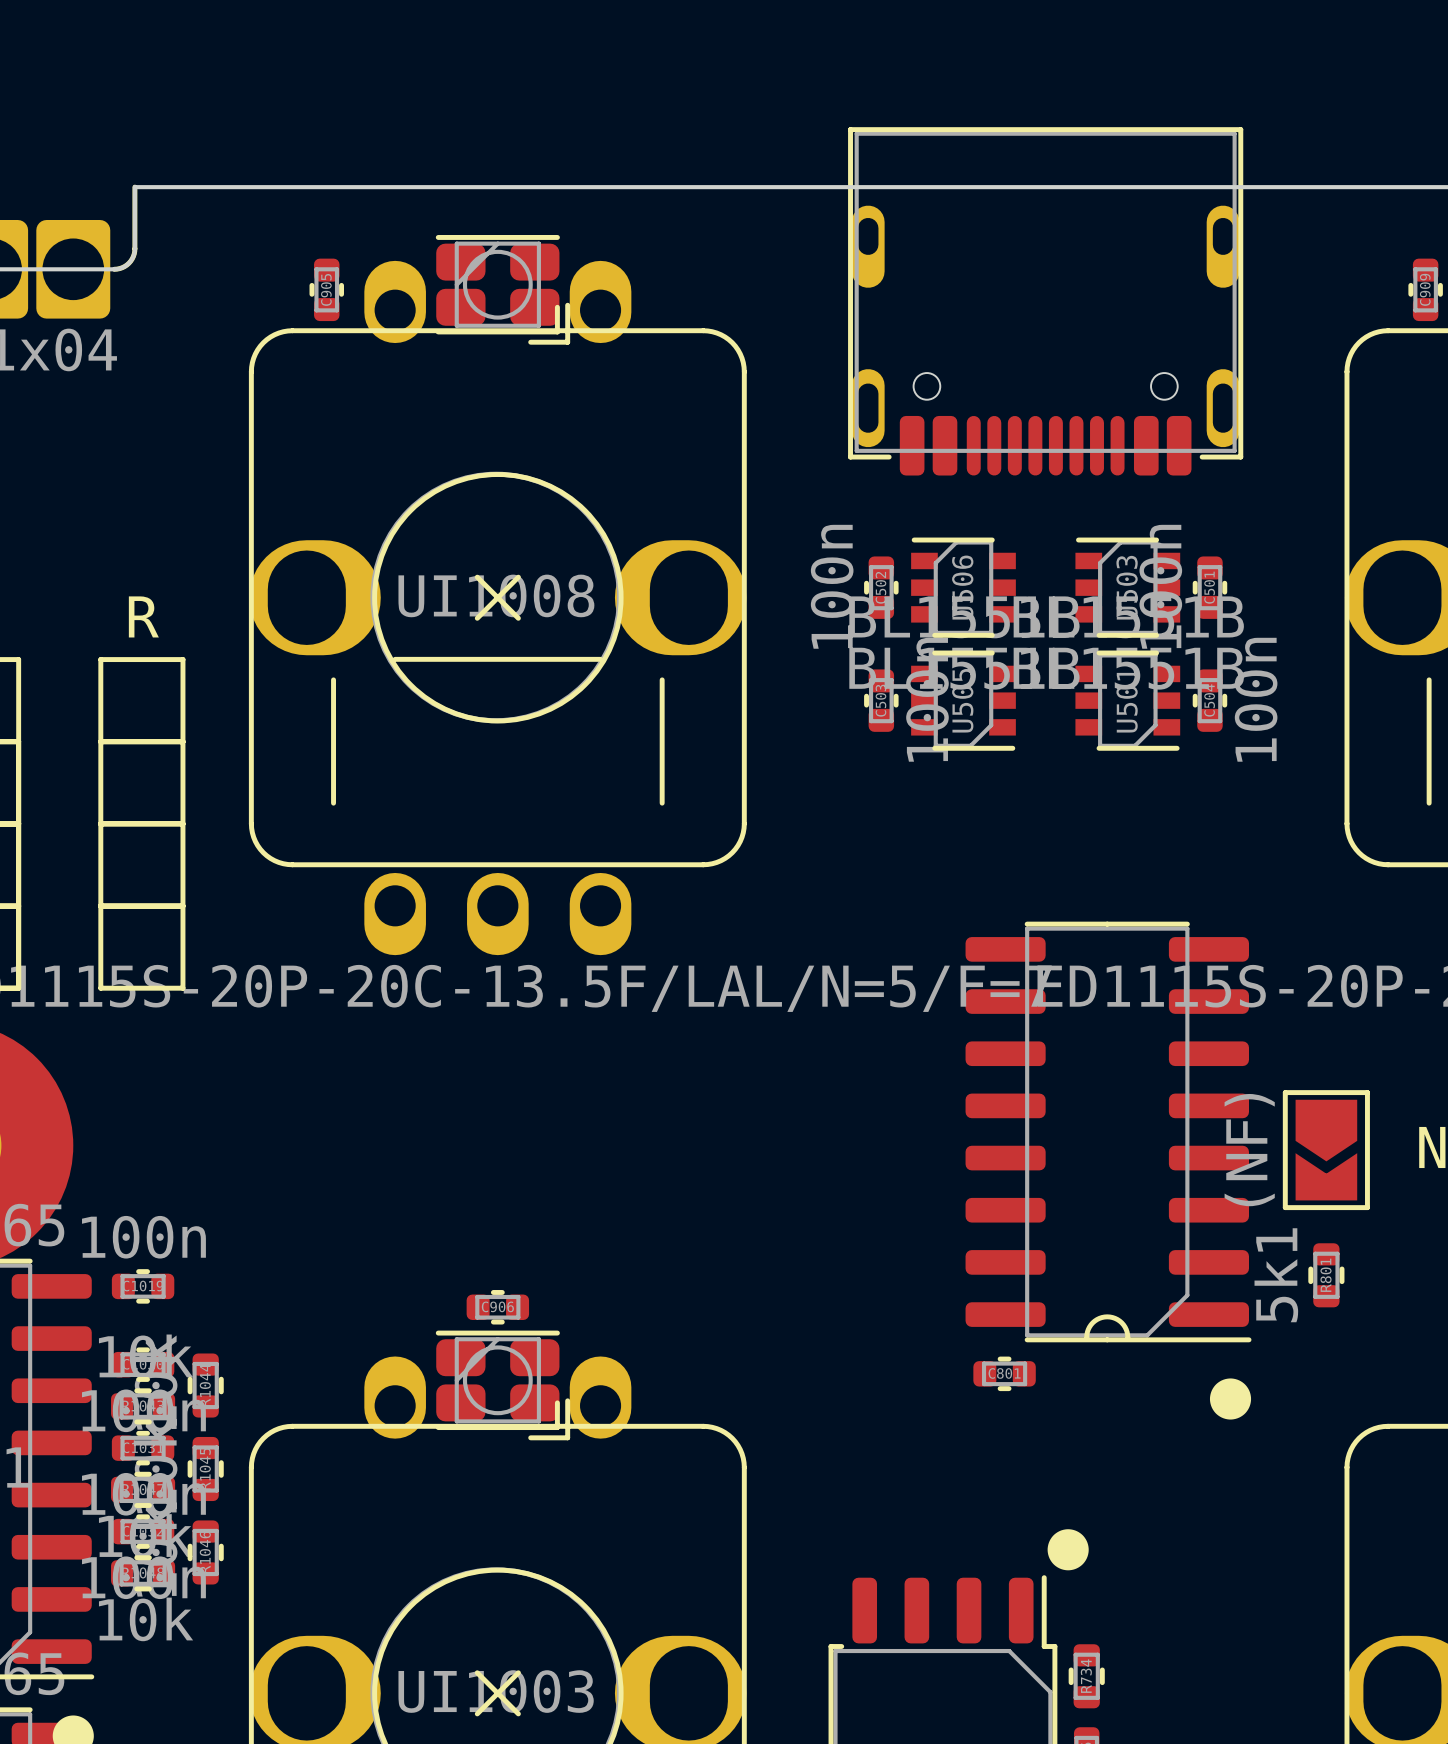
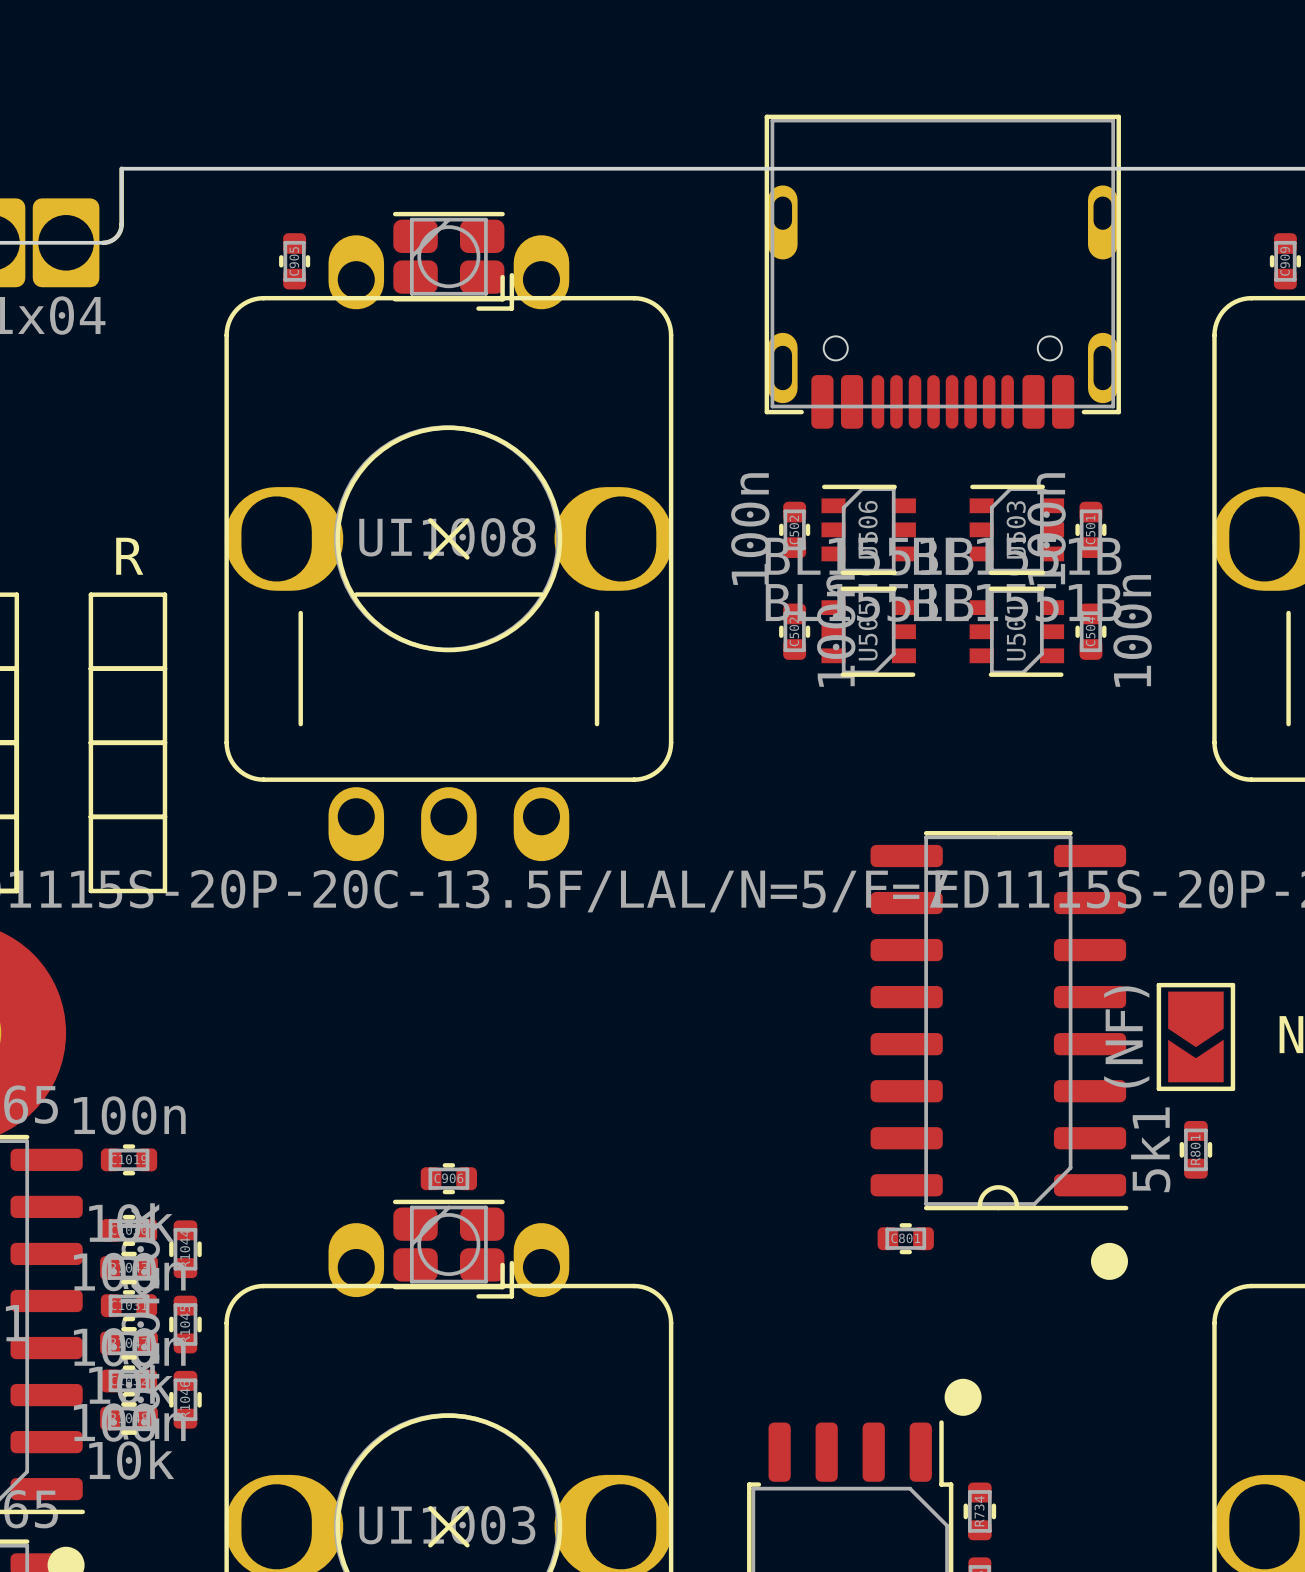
C503 name: C503 (880, 700) -> C502 (794, 631)

